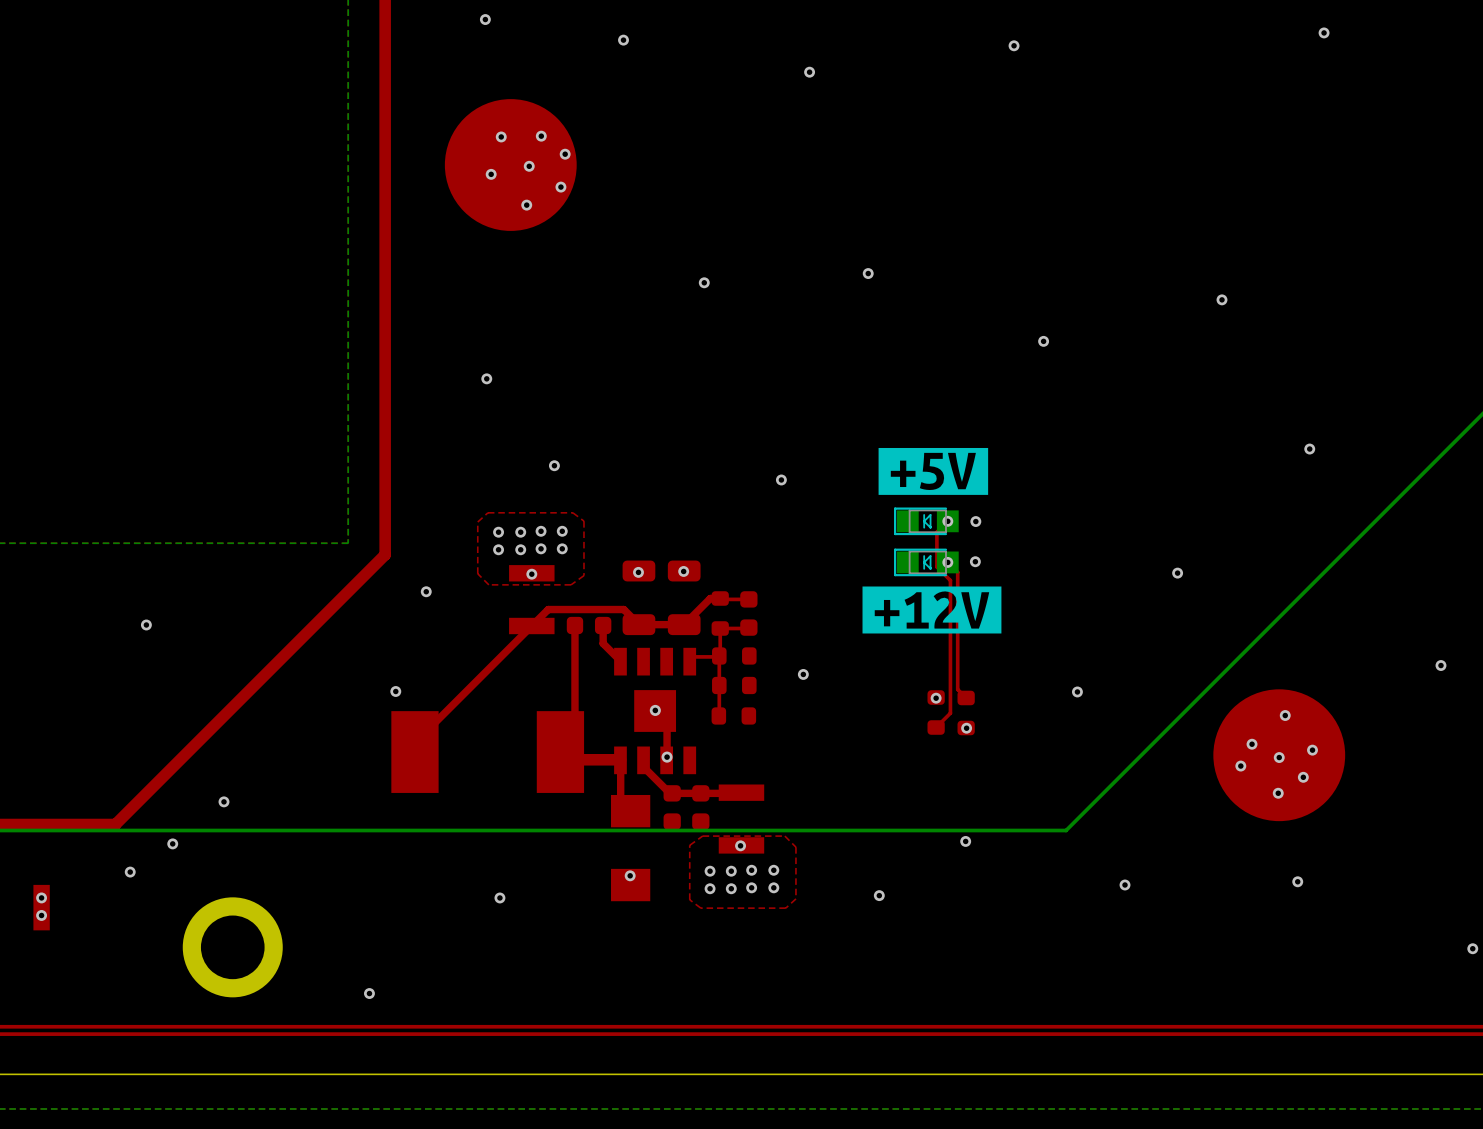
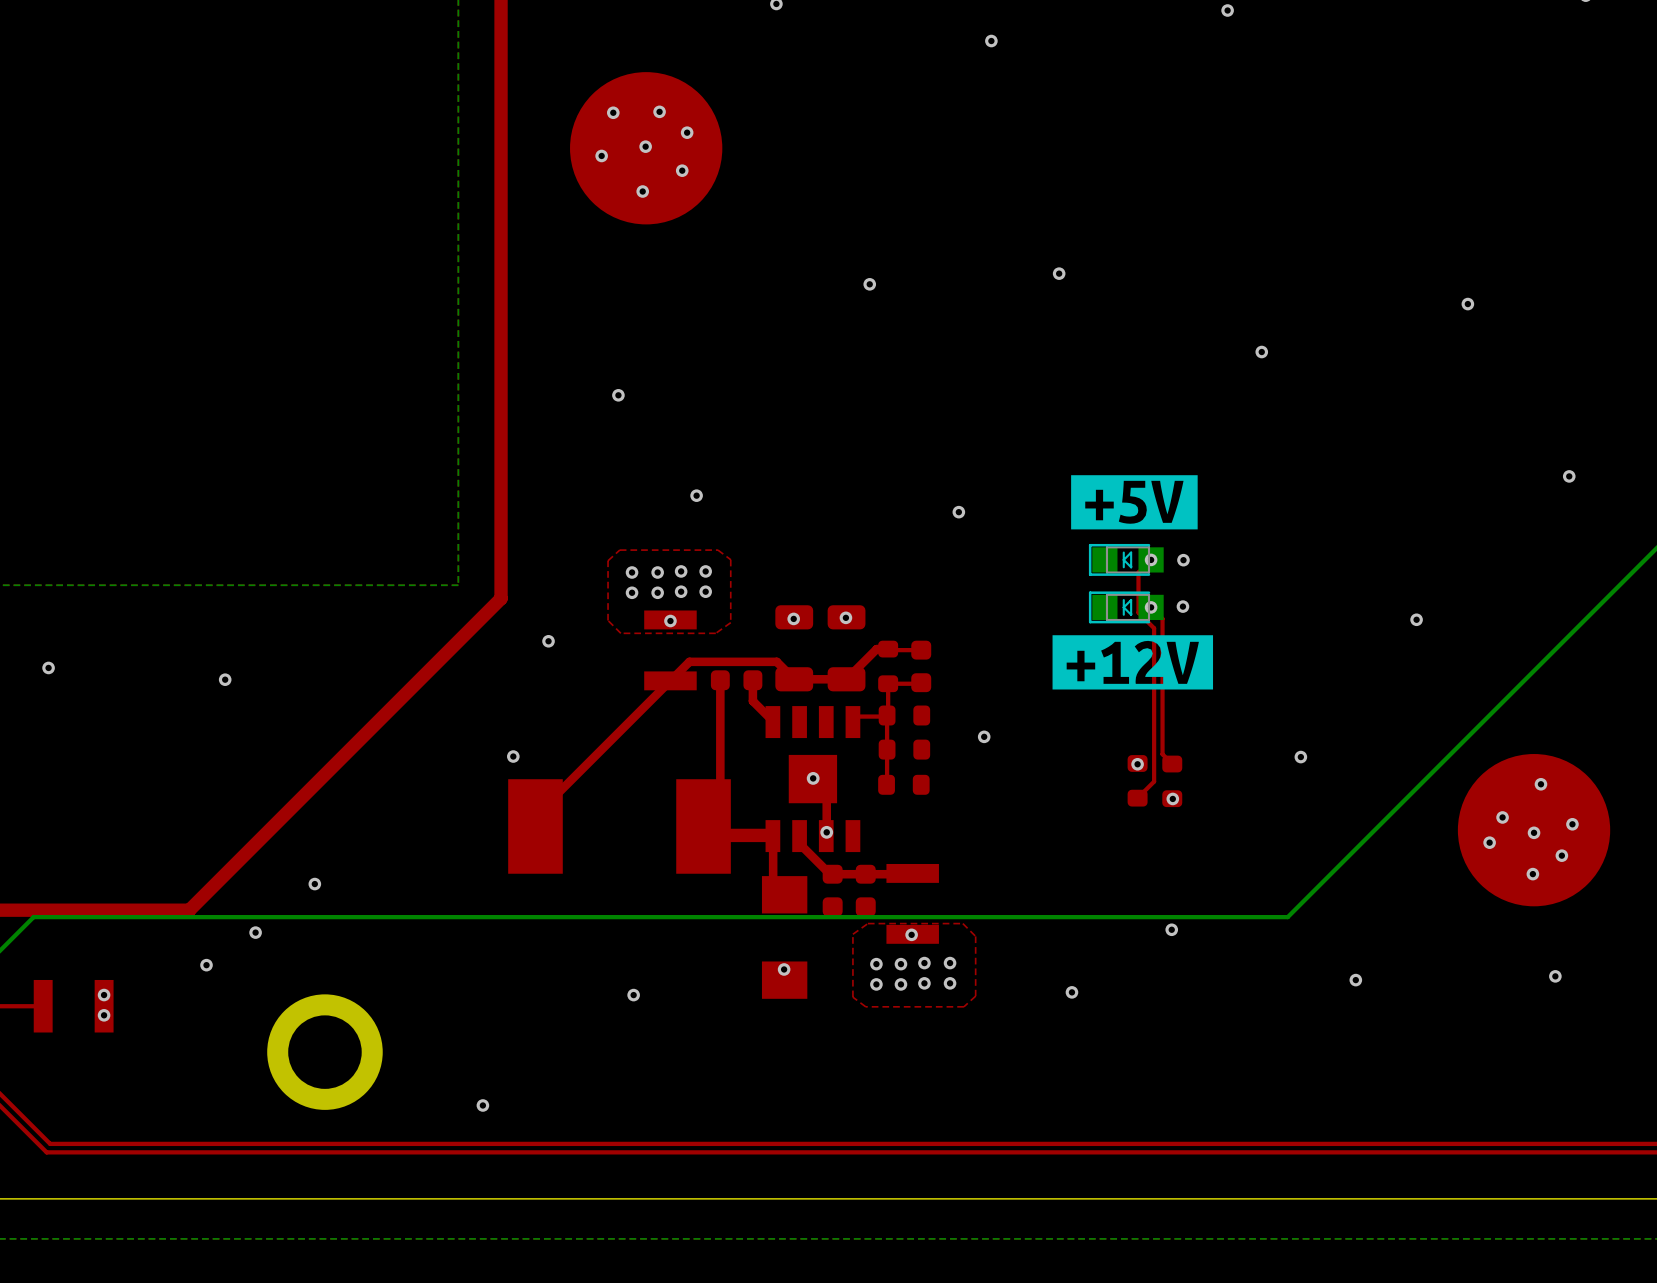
via: none -> (659, 111)
via: none -> (613, 112)
via: (501, 136) -> none
via: (541, 136) -> none
via: none -> (687, 132)
via: (565, 154) -> none
via: none -> (645, 146)
via: (529, 166) -> none
via: none -> (601, 155)
via: (491, 174) -> none
via: none -> (682, 170)
via: (560, 187) -> none
via: none -> (642, 191)
via: (526, 205) -> none

